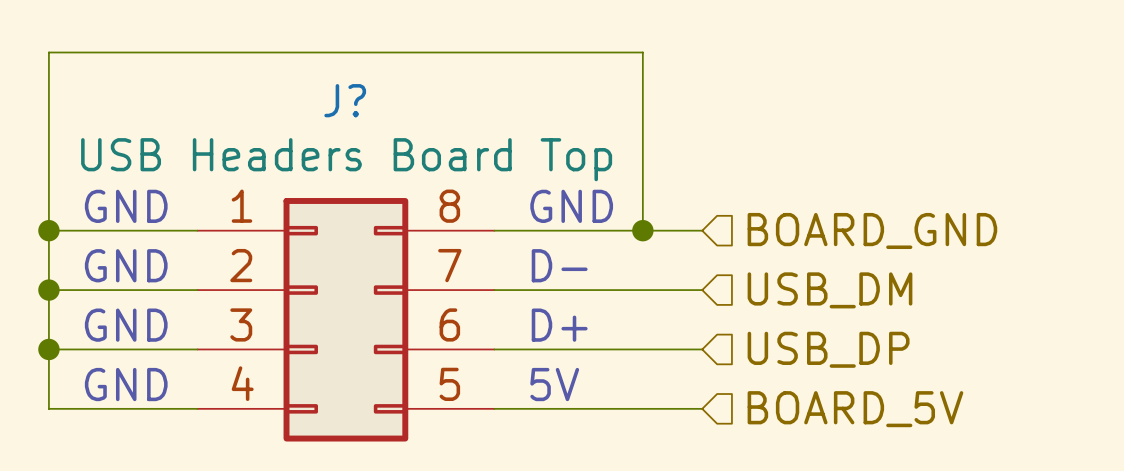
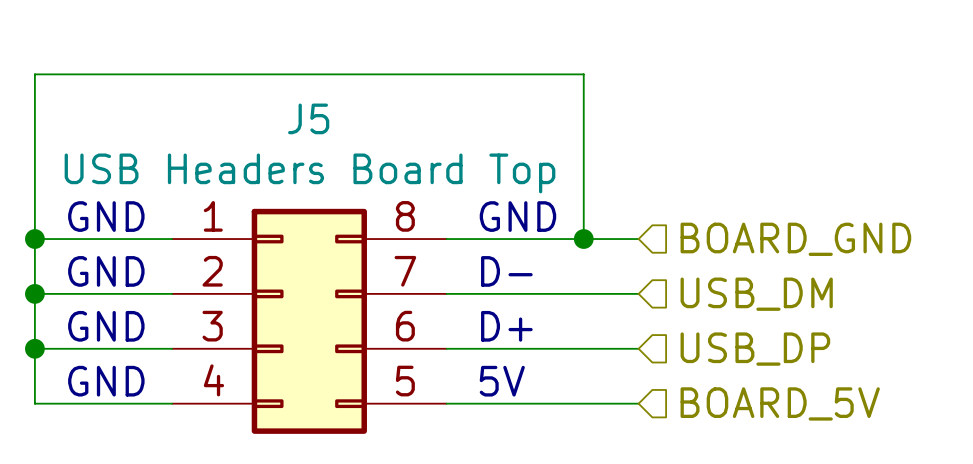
J? name: J? (345, 100) -> J5 (308, 118)

